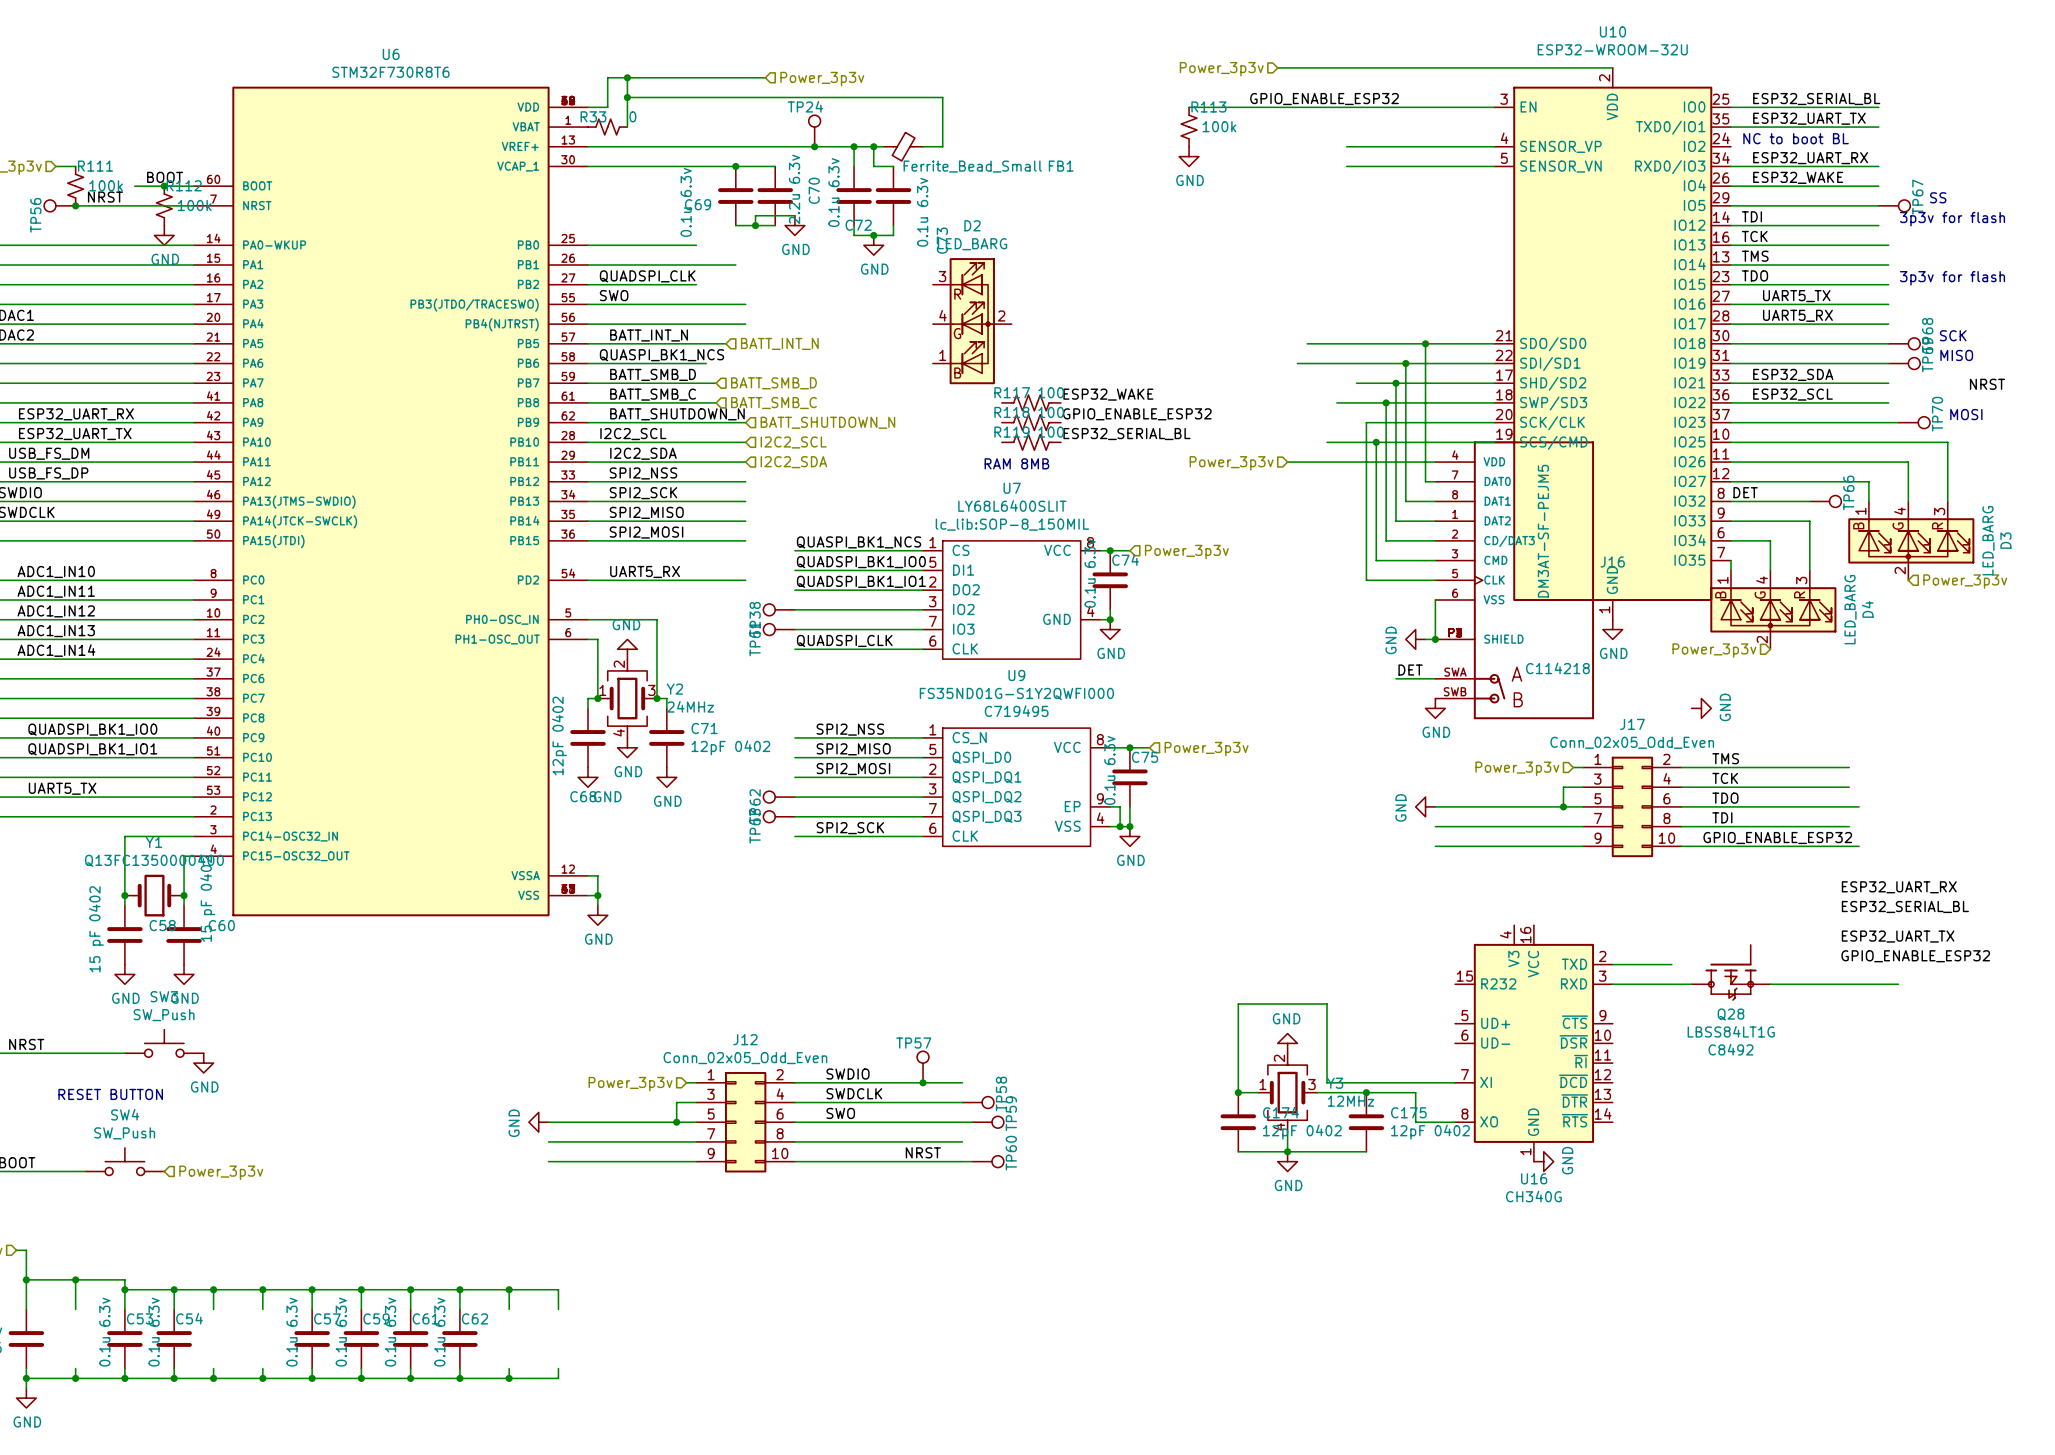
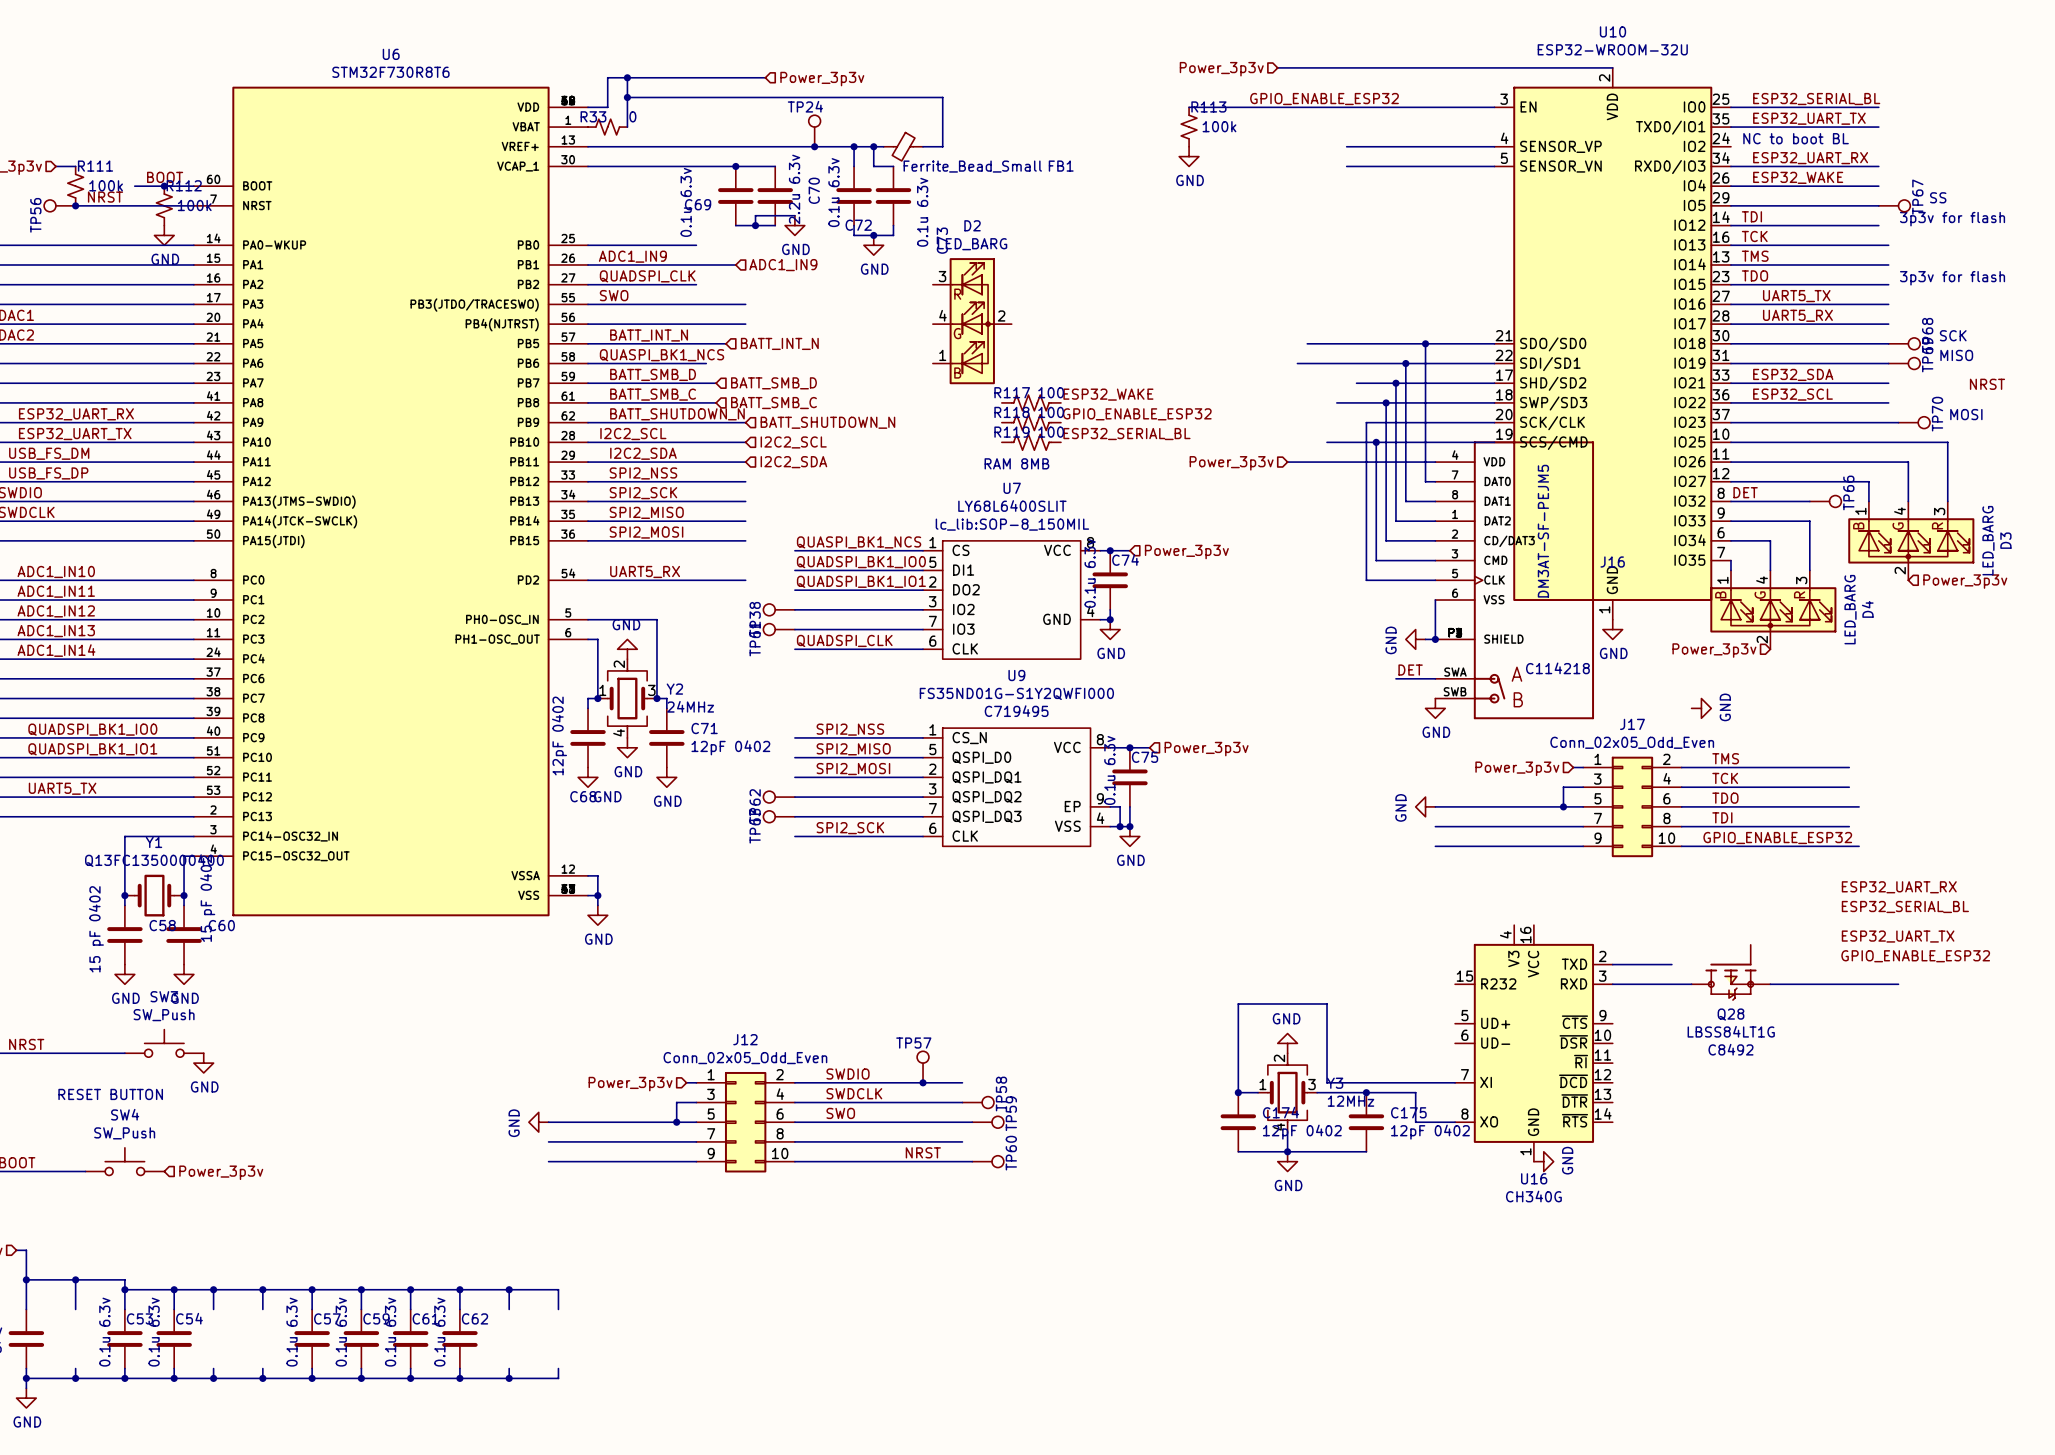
label: none -> ADC1_IN9 (632, 256)
hierarchical label: none -> ADC1_IN9 (783, 265)

